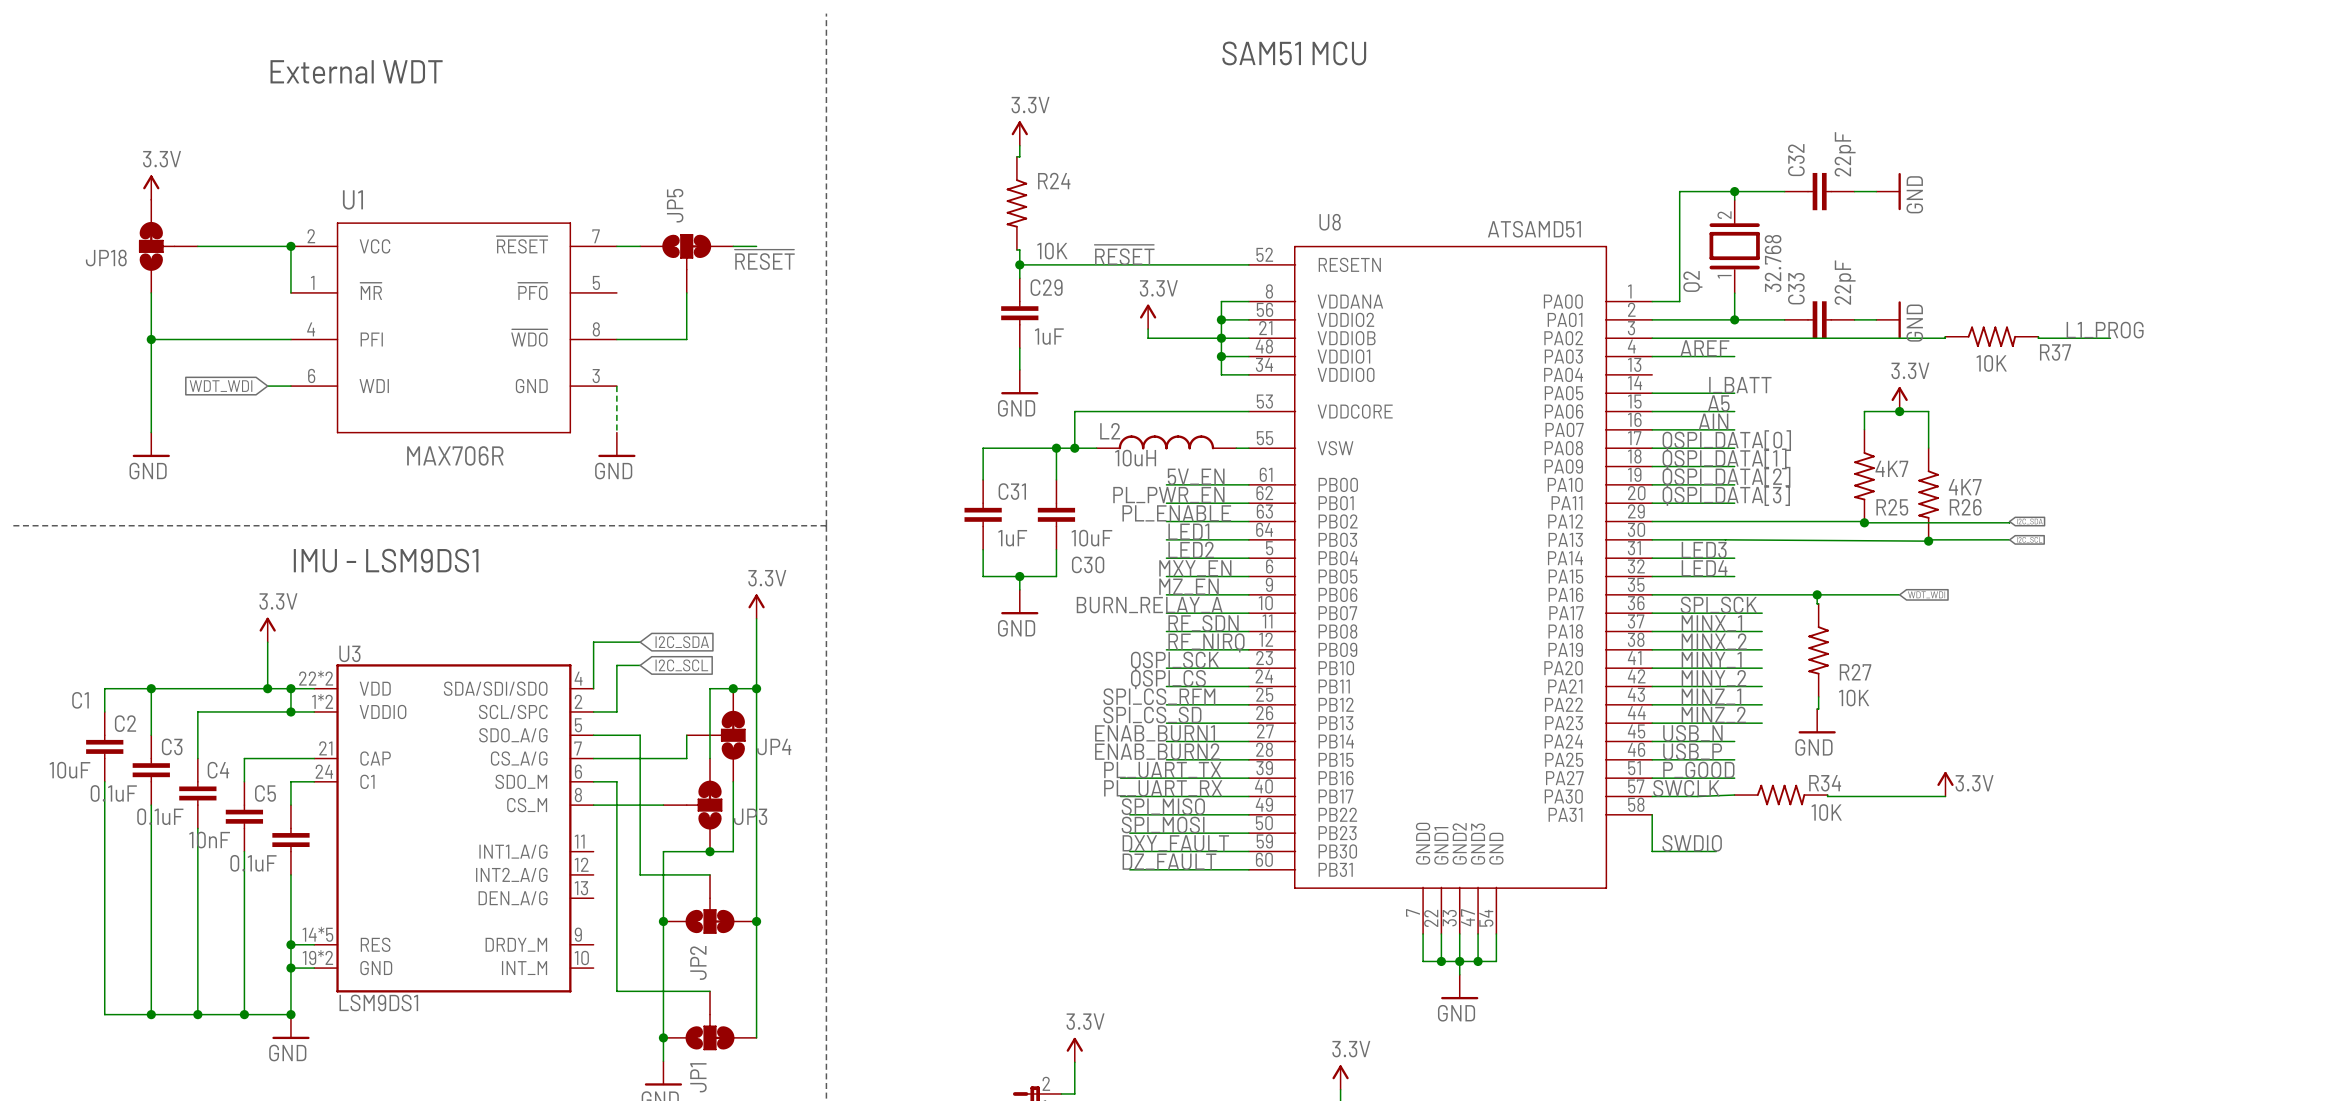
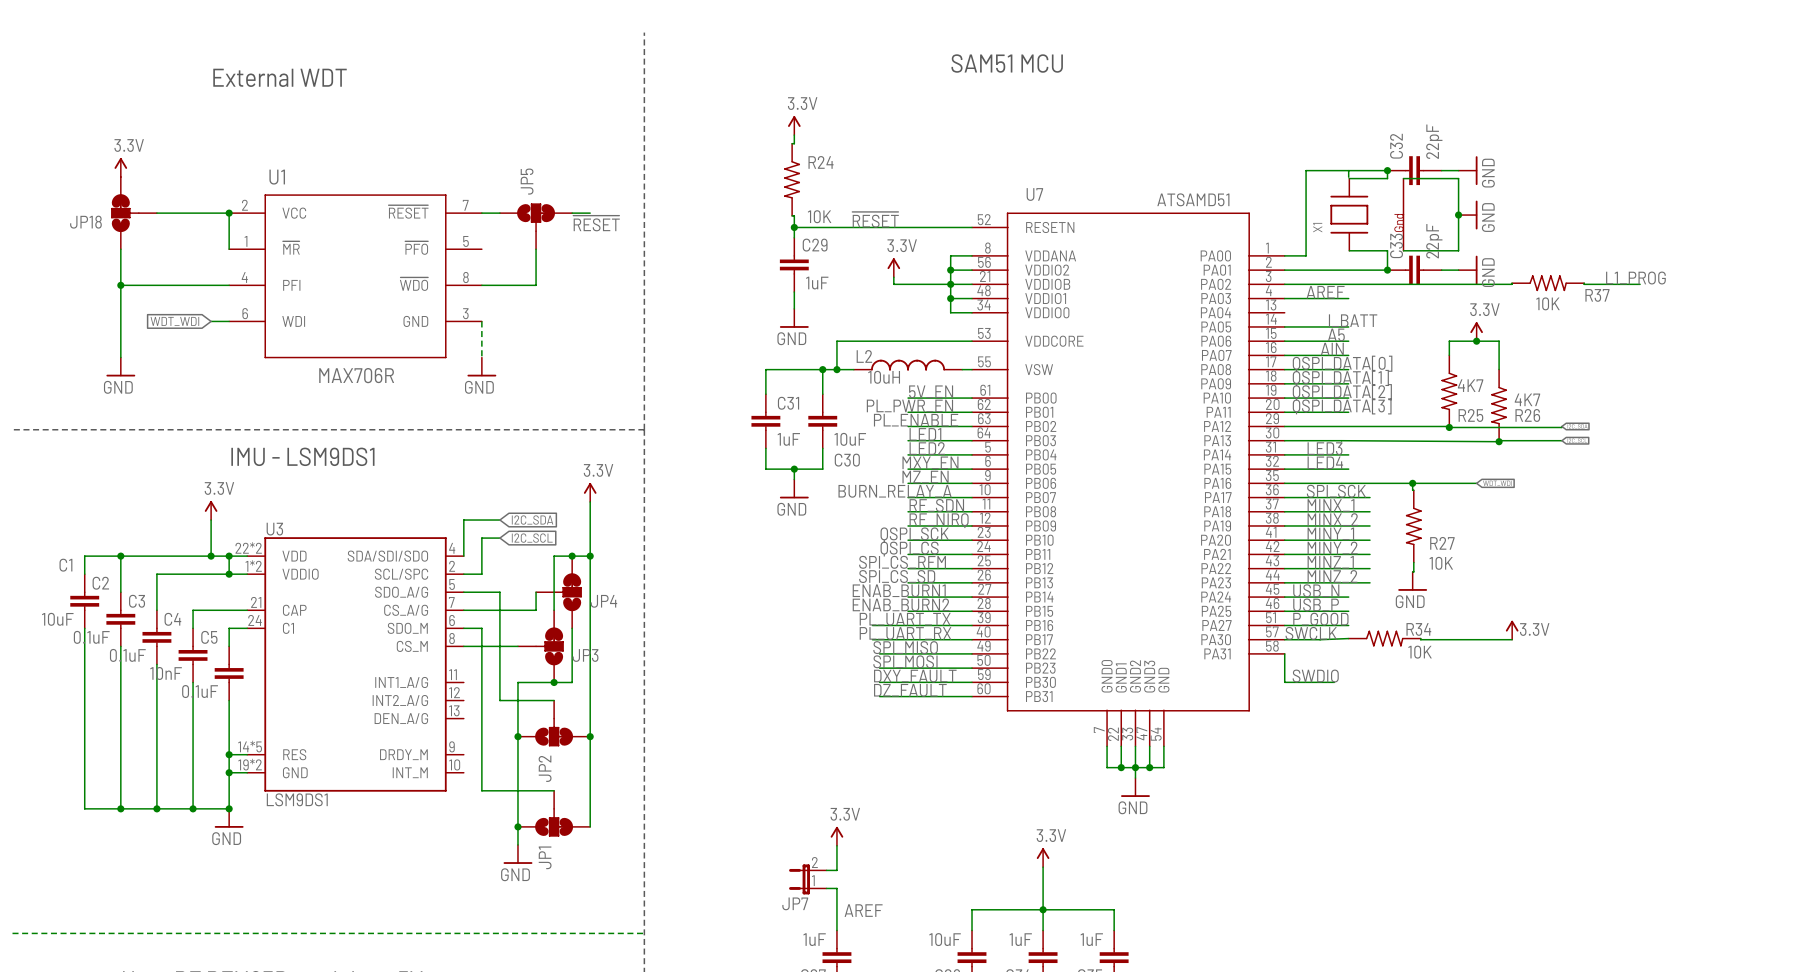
junction position: (1734, 191) -> (1387, 170)
wire: none -> (1387, 170) (1387, 178) (1349, 178)
wire: none -> (1403, 178) (1458, 178) (1458, 250) (1403, 250)
U8 name: U8 (1330, 222) -> U7 (1034, 194)
Q2: 32.768 (1734, 246) -> none
X1: none -> (1366, 214)
junction: none -> (1458, 215)
power symbol: none -> GND (1468, 215)
wire: (1734, 293) (1734, 319) -> none
wire: none -> (1349, 250) (1387, 250) (1387, 270)
junction position: (1734, 319) -> (1387, 270)

